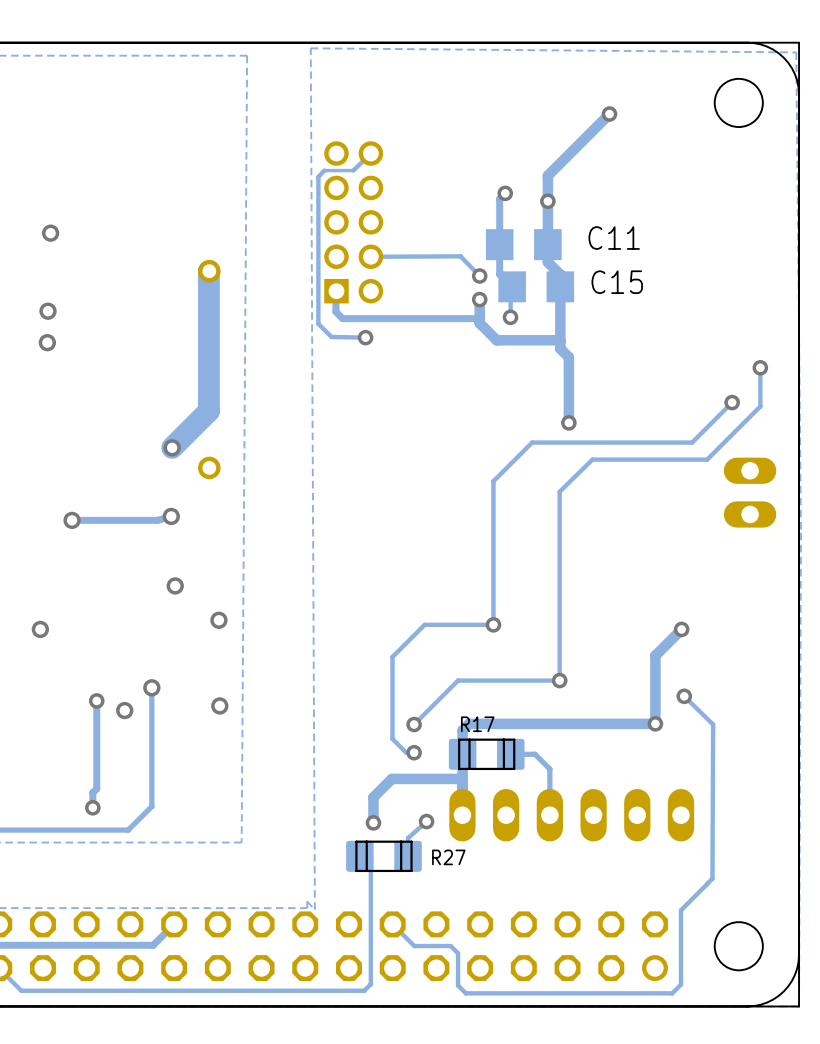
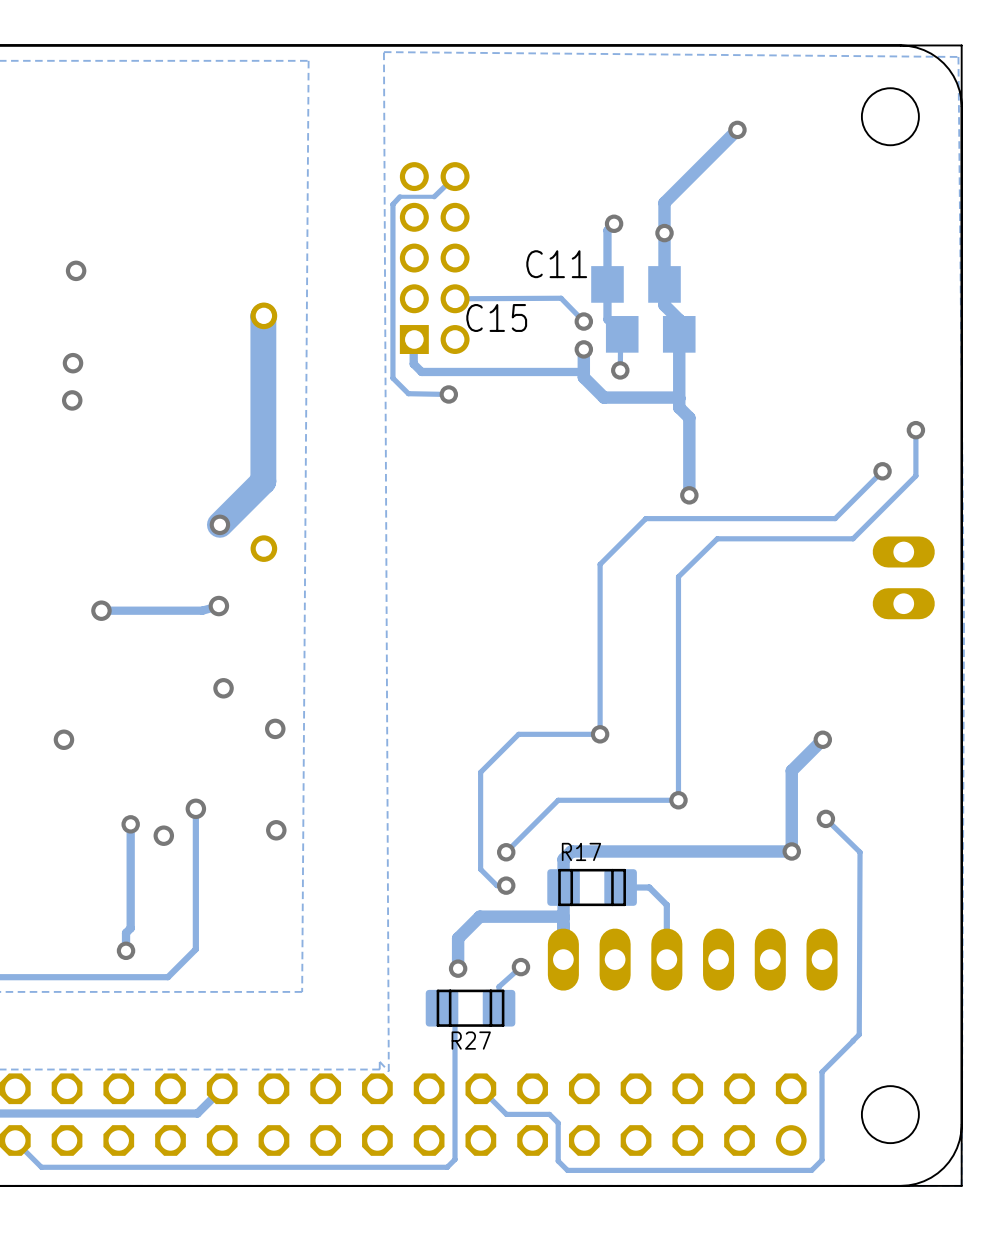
C11 name position: C11 (614, 238) -> C11 (556, 264)
C15 name position: C15 (617, 282) -> C15 (496, 317)
R27 name position: R27 (448, 857) -> R27 (471, 1040)

